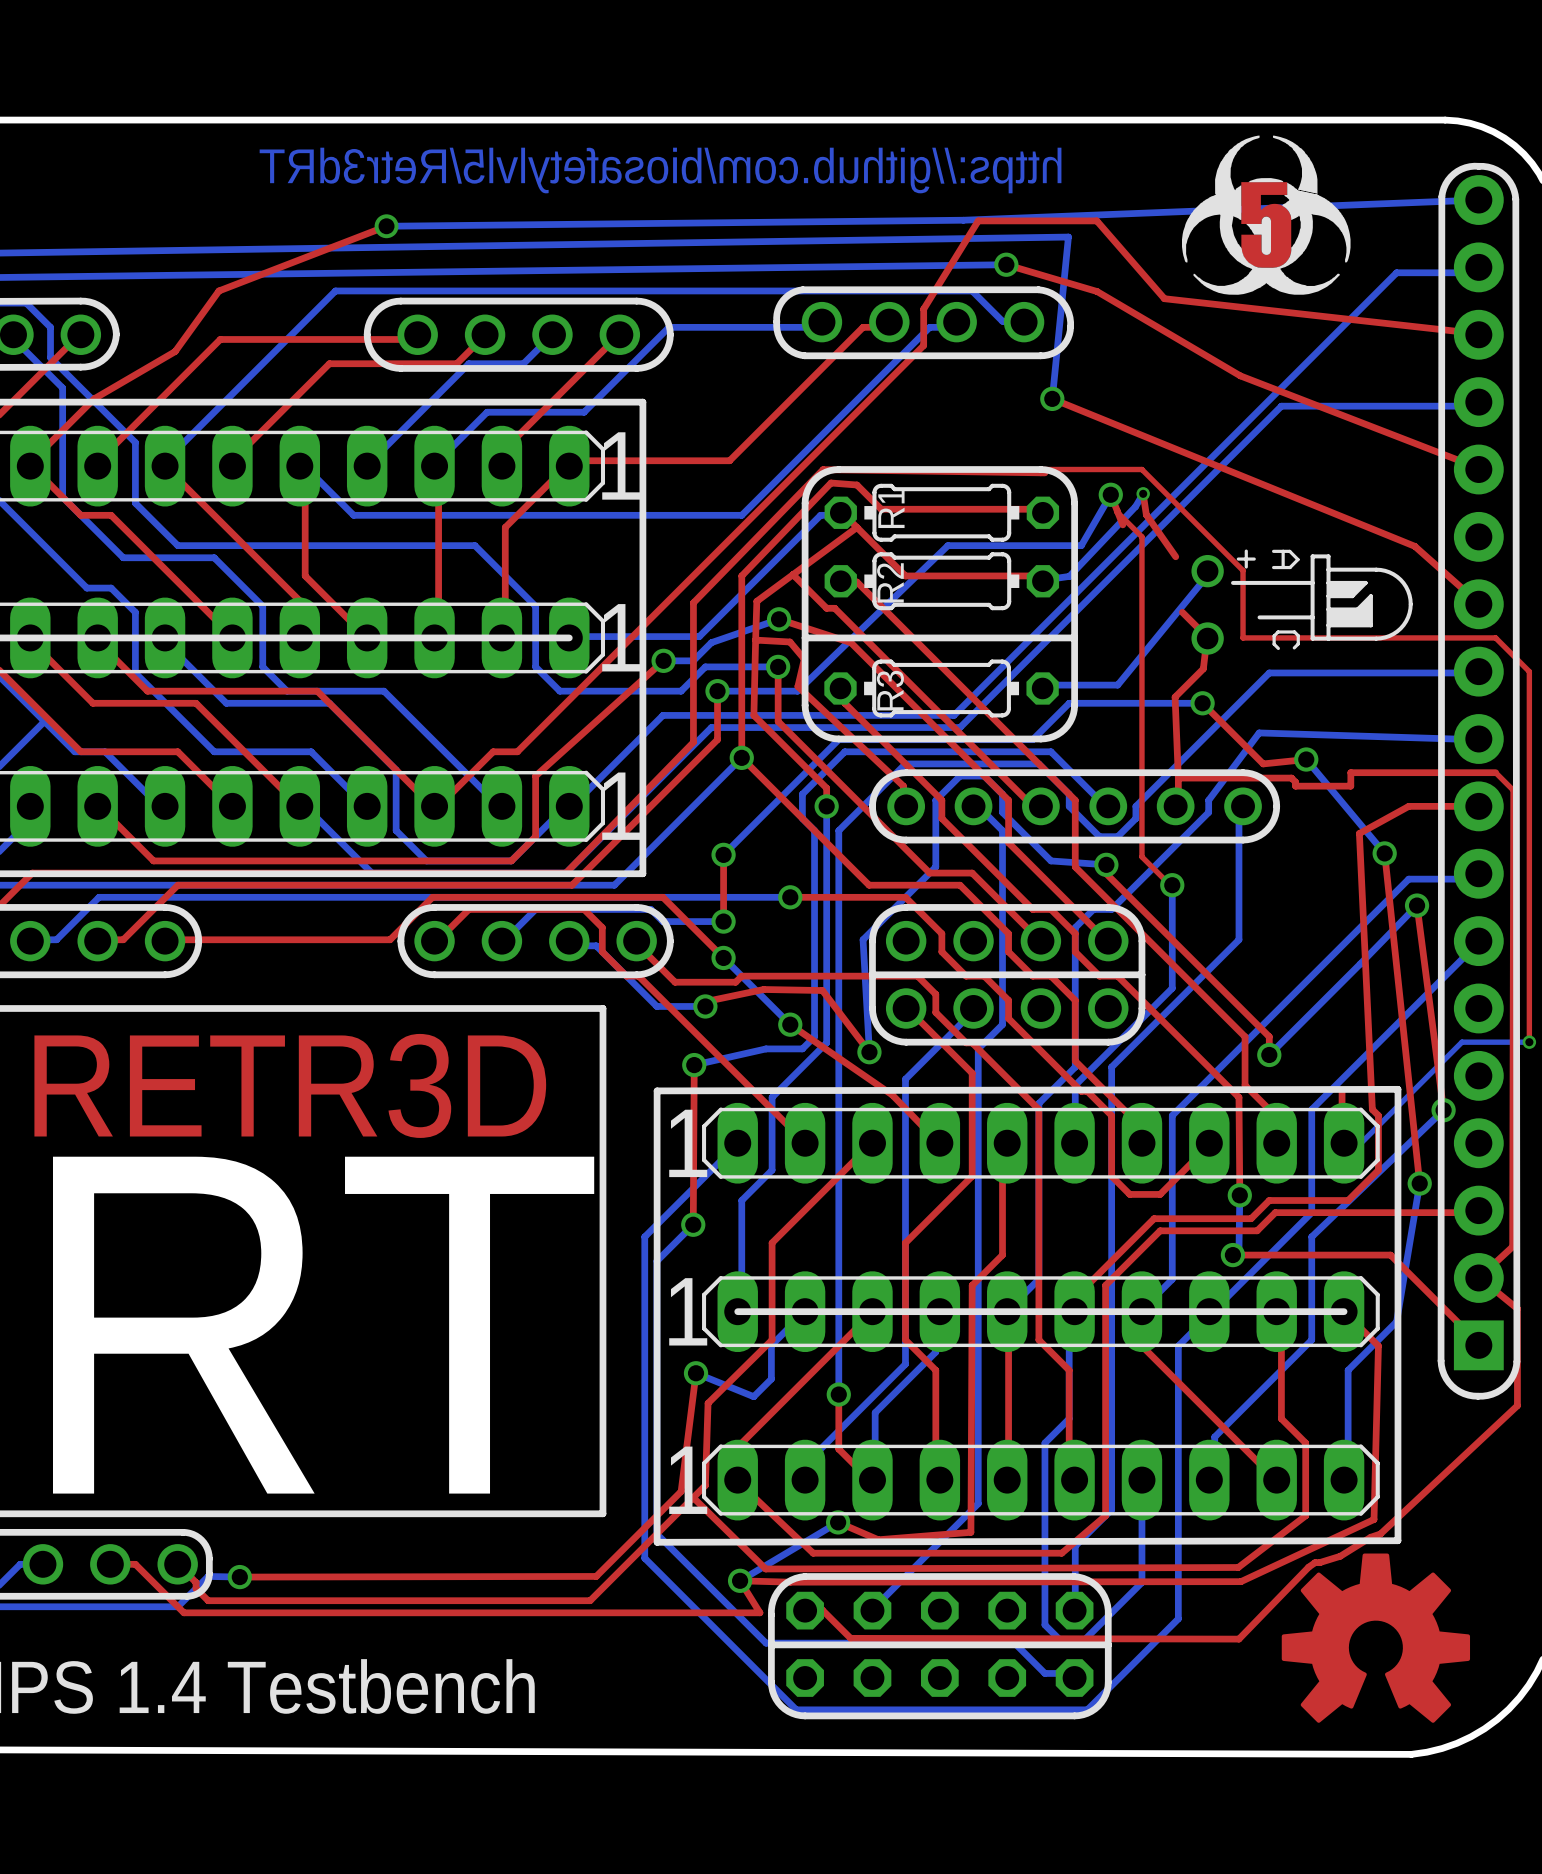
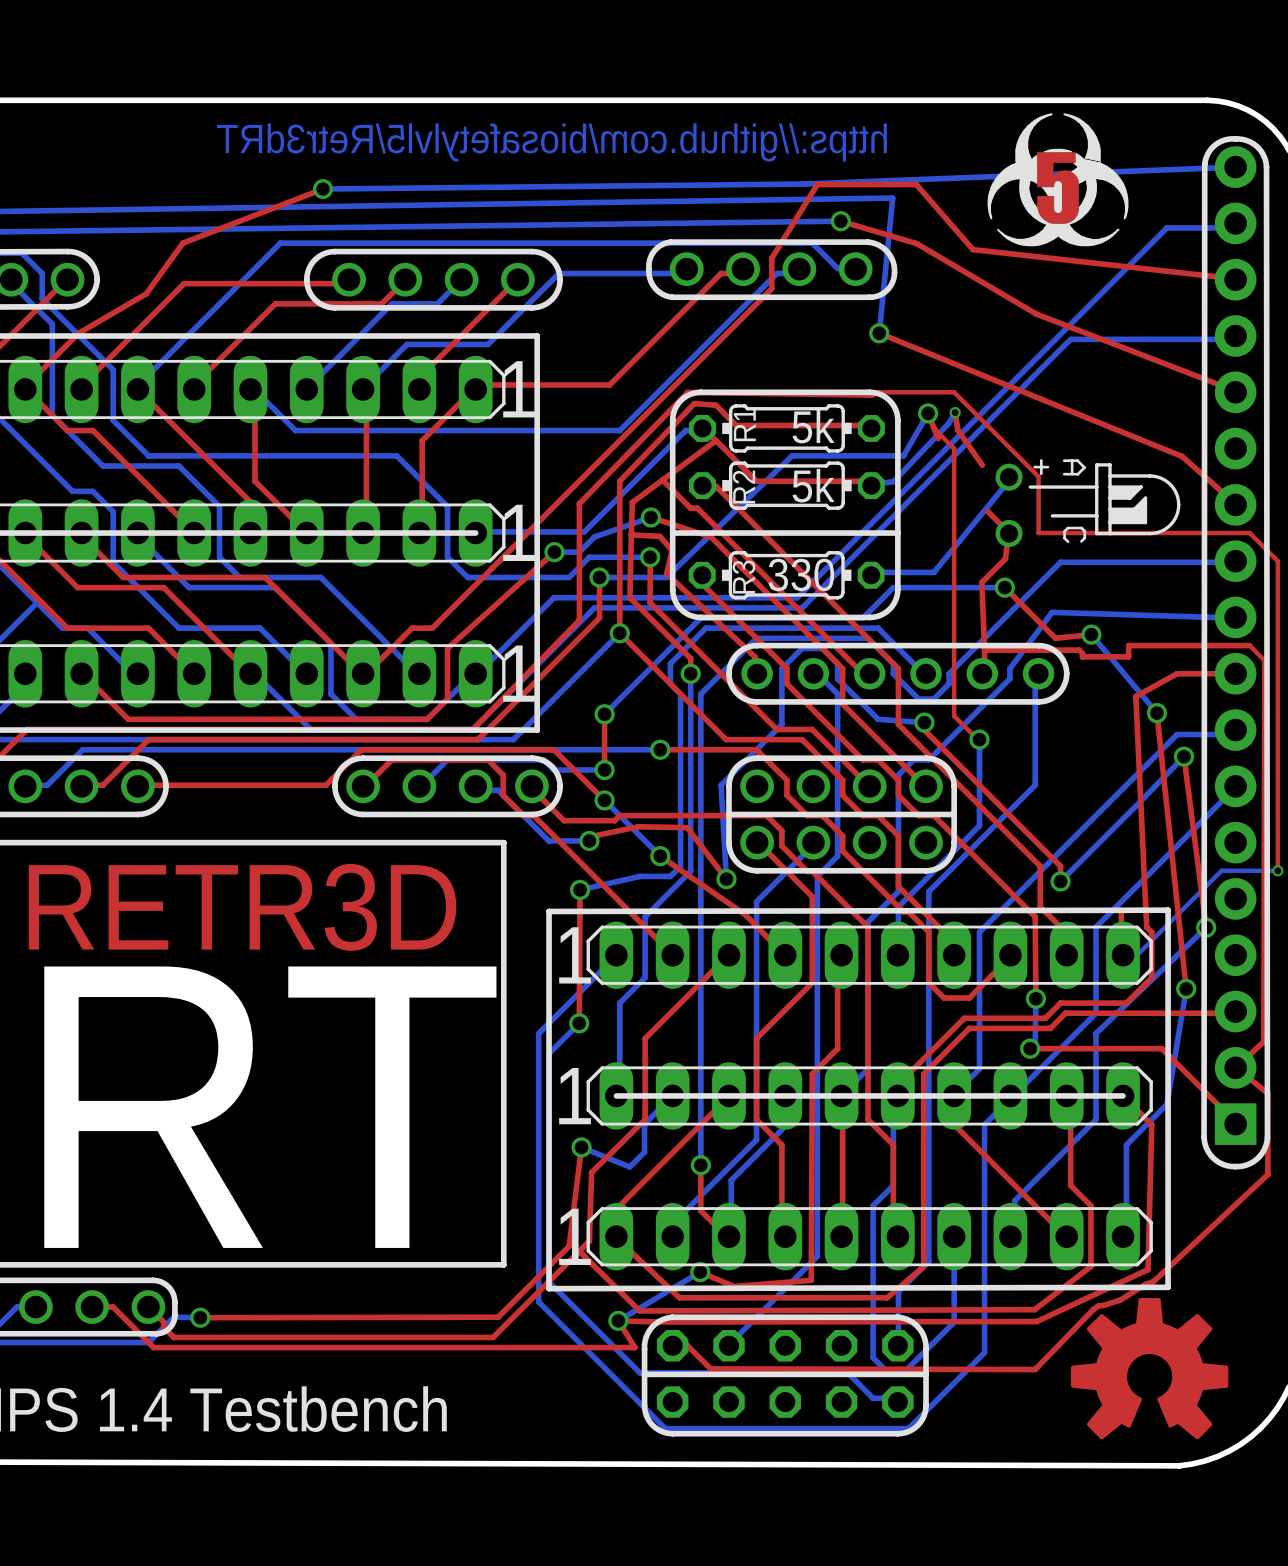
text: none -> 5k (813, 426)
text: none -> 5k (813, 485)
text: none -> 330 (801, 574)

